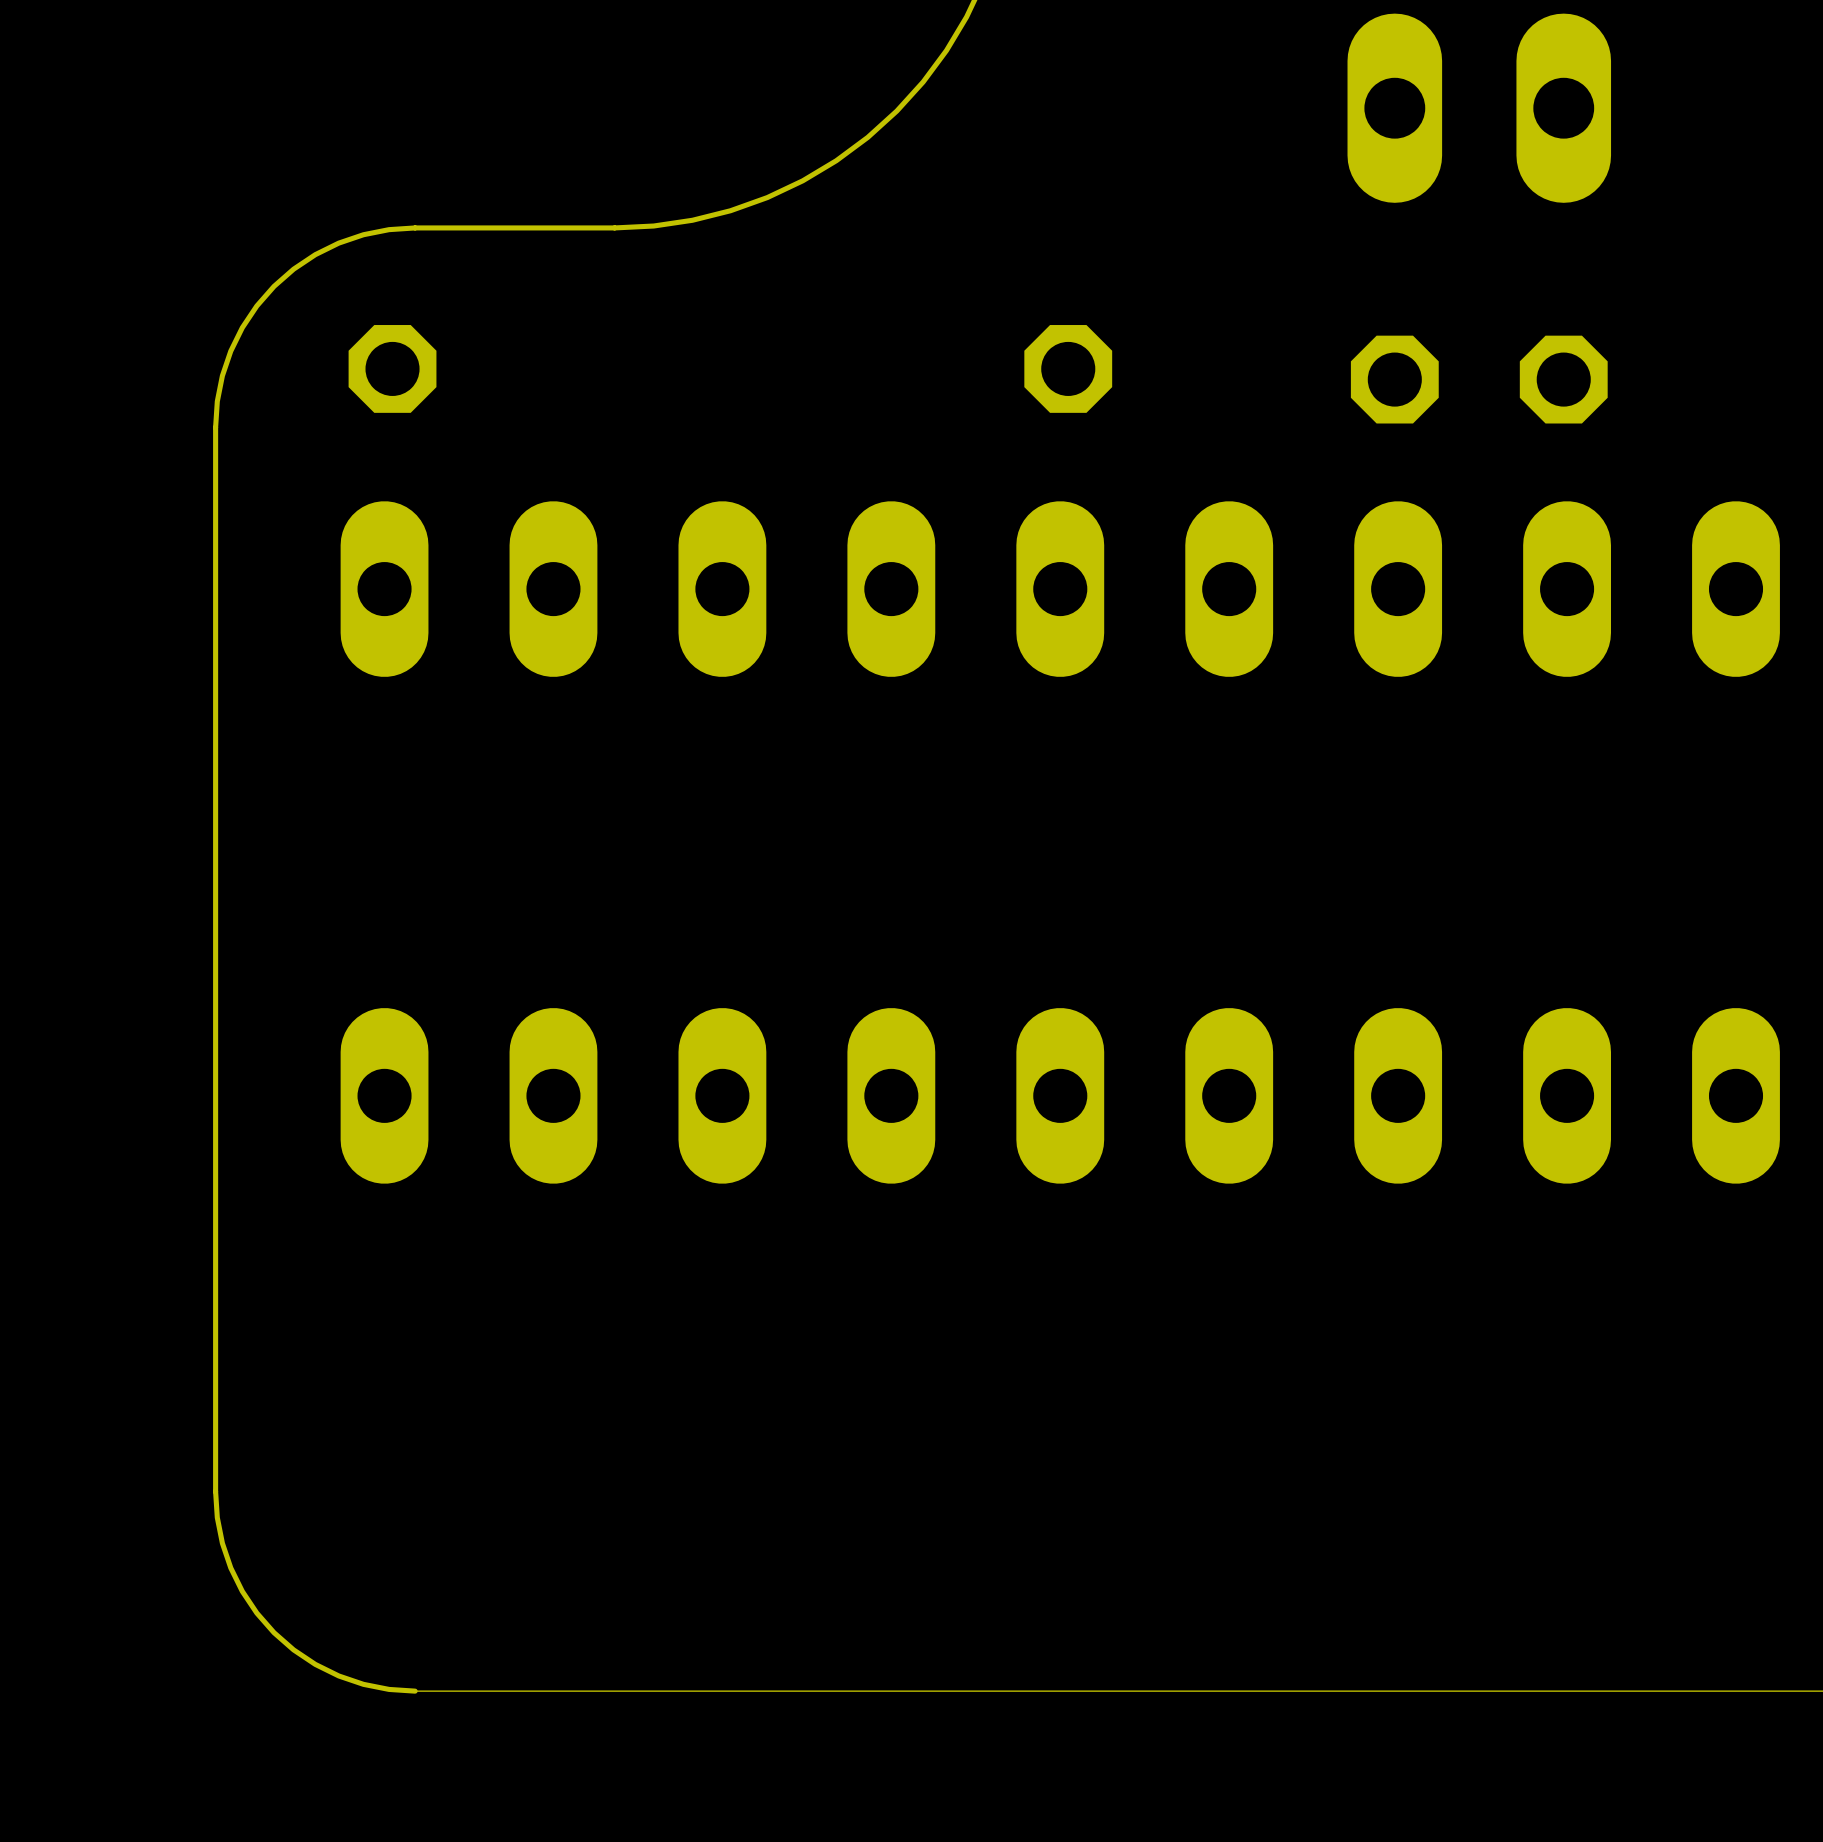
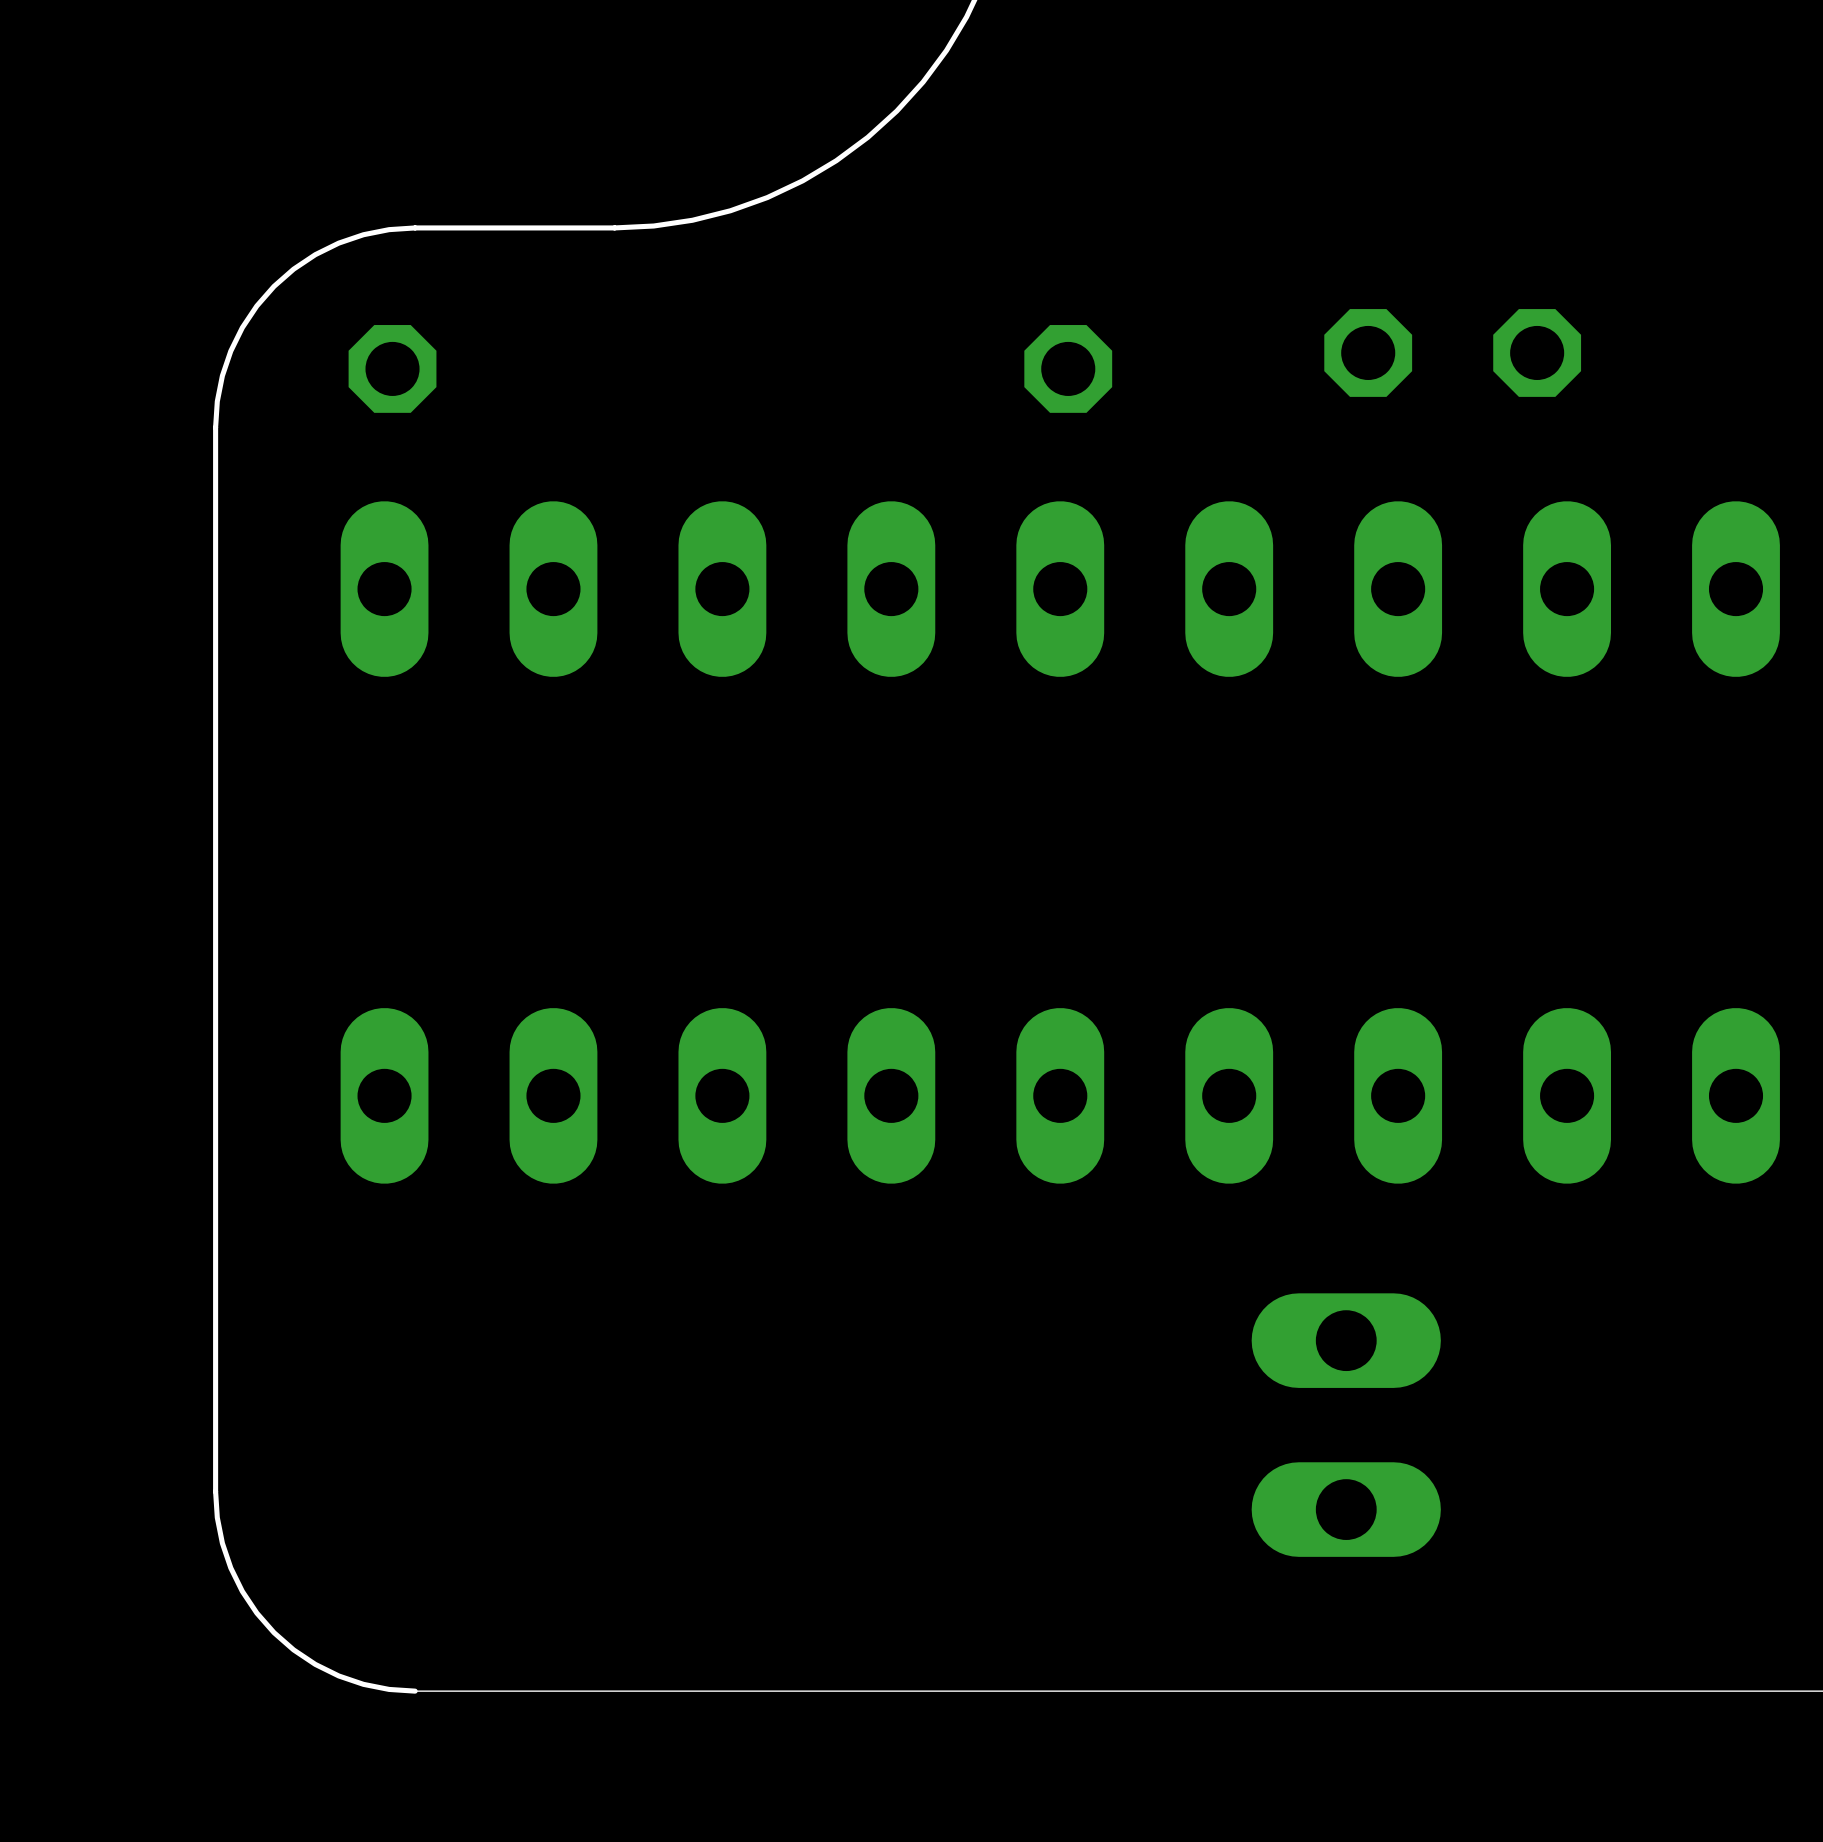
part rotation: 0° (1479, 108) -> 90° clockwise (1346, 1425)
part position: (1479, 108) -> (1346, 1425)
part position: (1479, 379) -> (1452, 352)

